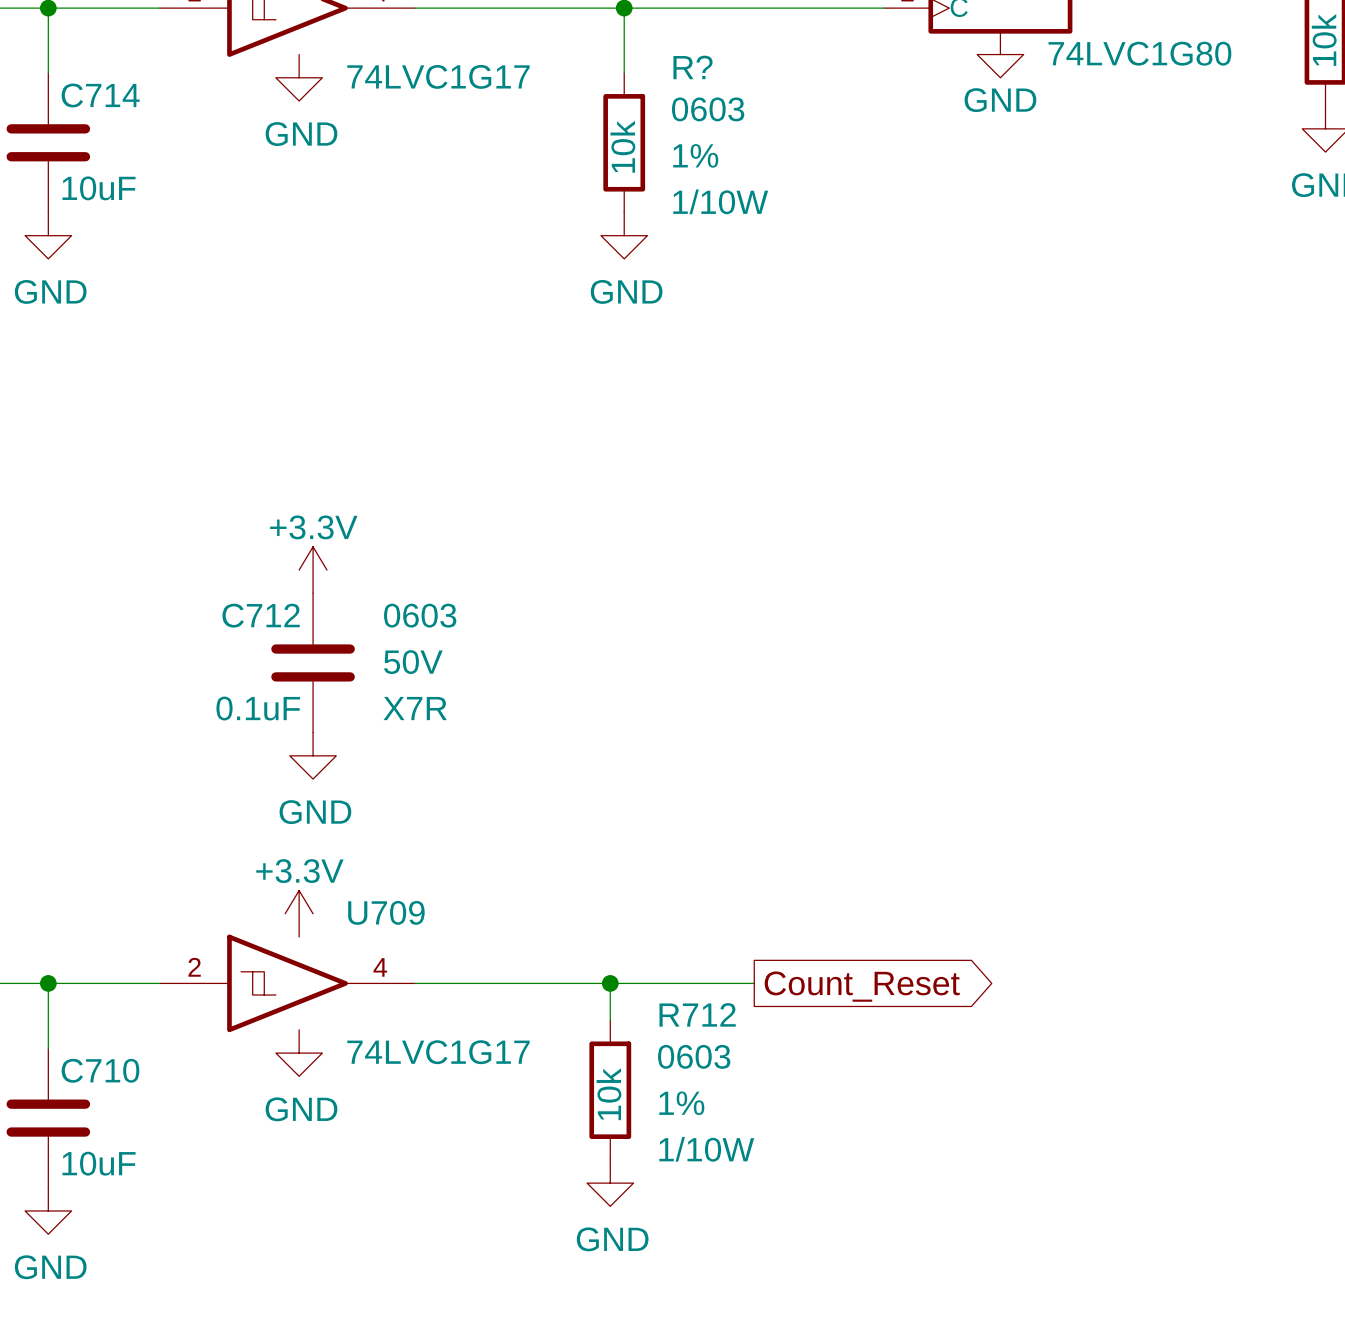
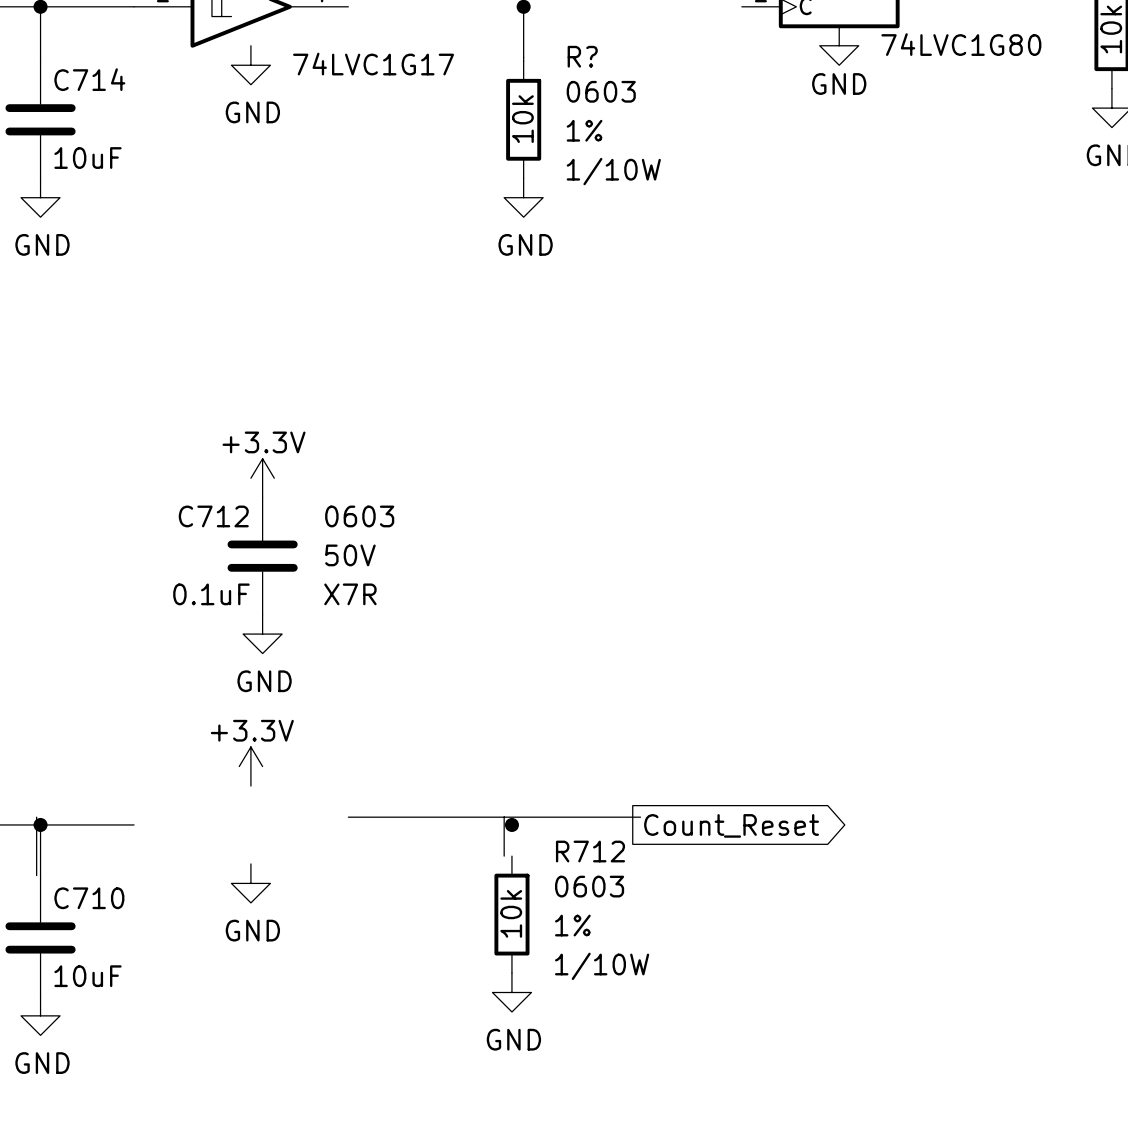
wire: (415, 8) (884, 8) -> none
wire: none -> (36, 817) (36, 875)
wire: none -> (348, 817) (640, 817)
wire: none -> (504, 817) (504, 856)
U709: 74LVC1G17 (287, 983) -> none
wire: (415, 983) (754, 983) -> none
wire: (610, 983) (610, 1020) -> none

